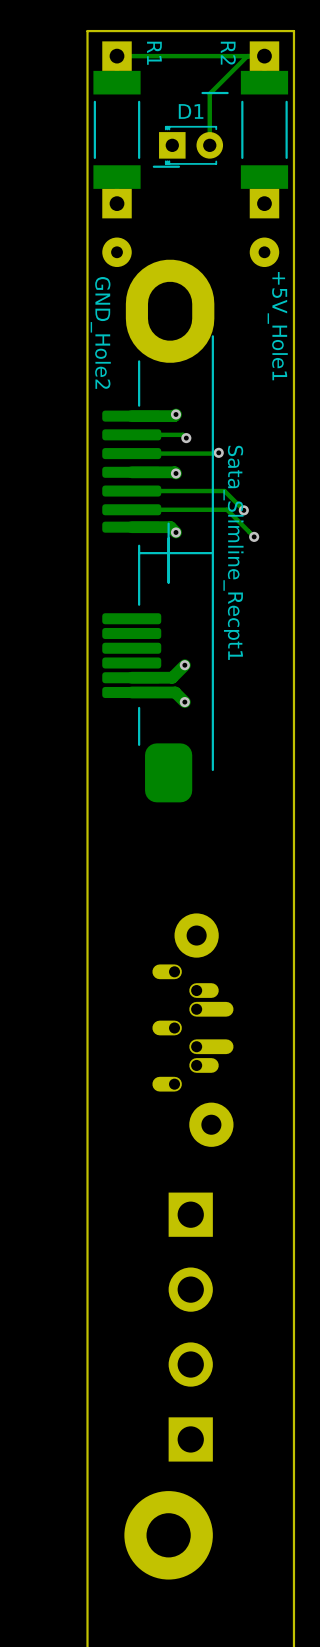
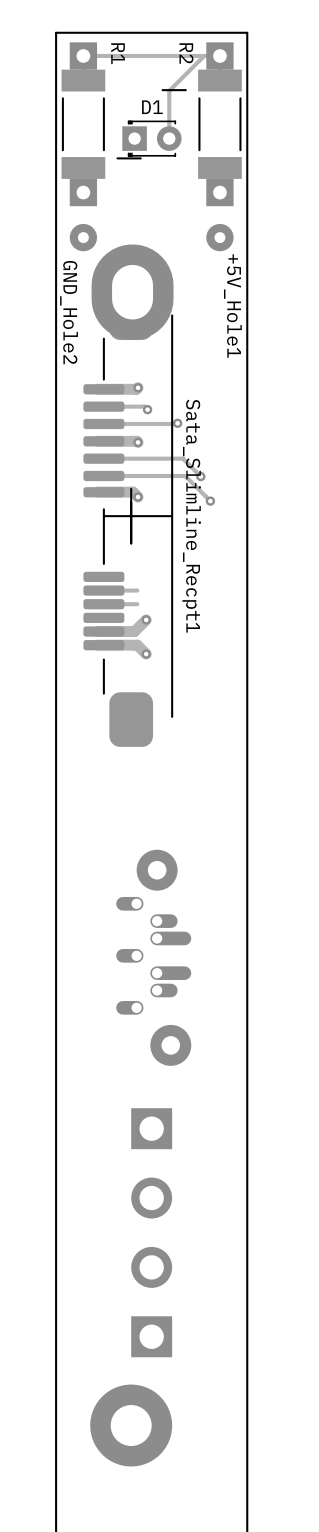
Sata_Slimline_Recpt1 footprint: [102, 318, 214, 803] -> [83, 285, 174, 747]
track: none -> (137, 590) (117, 590)
track: none -> (137, 604) (117, 604)

